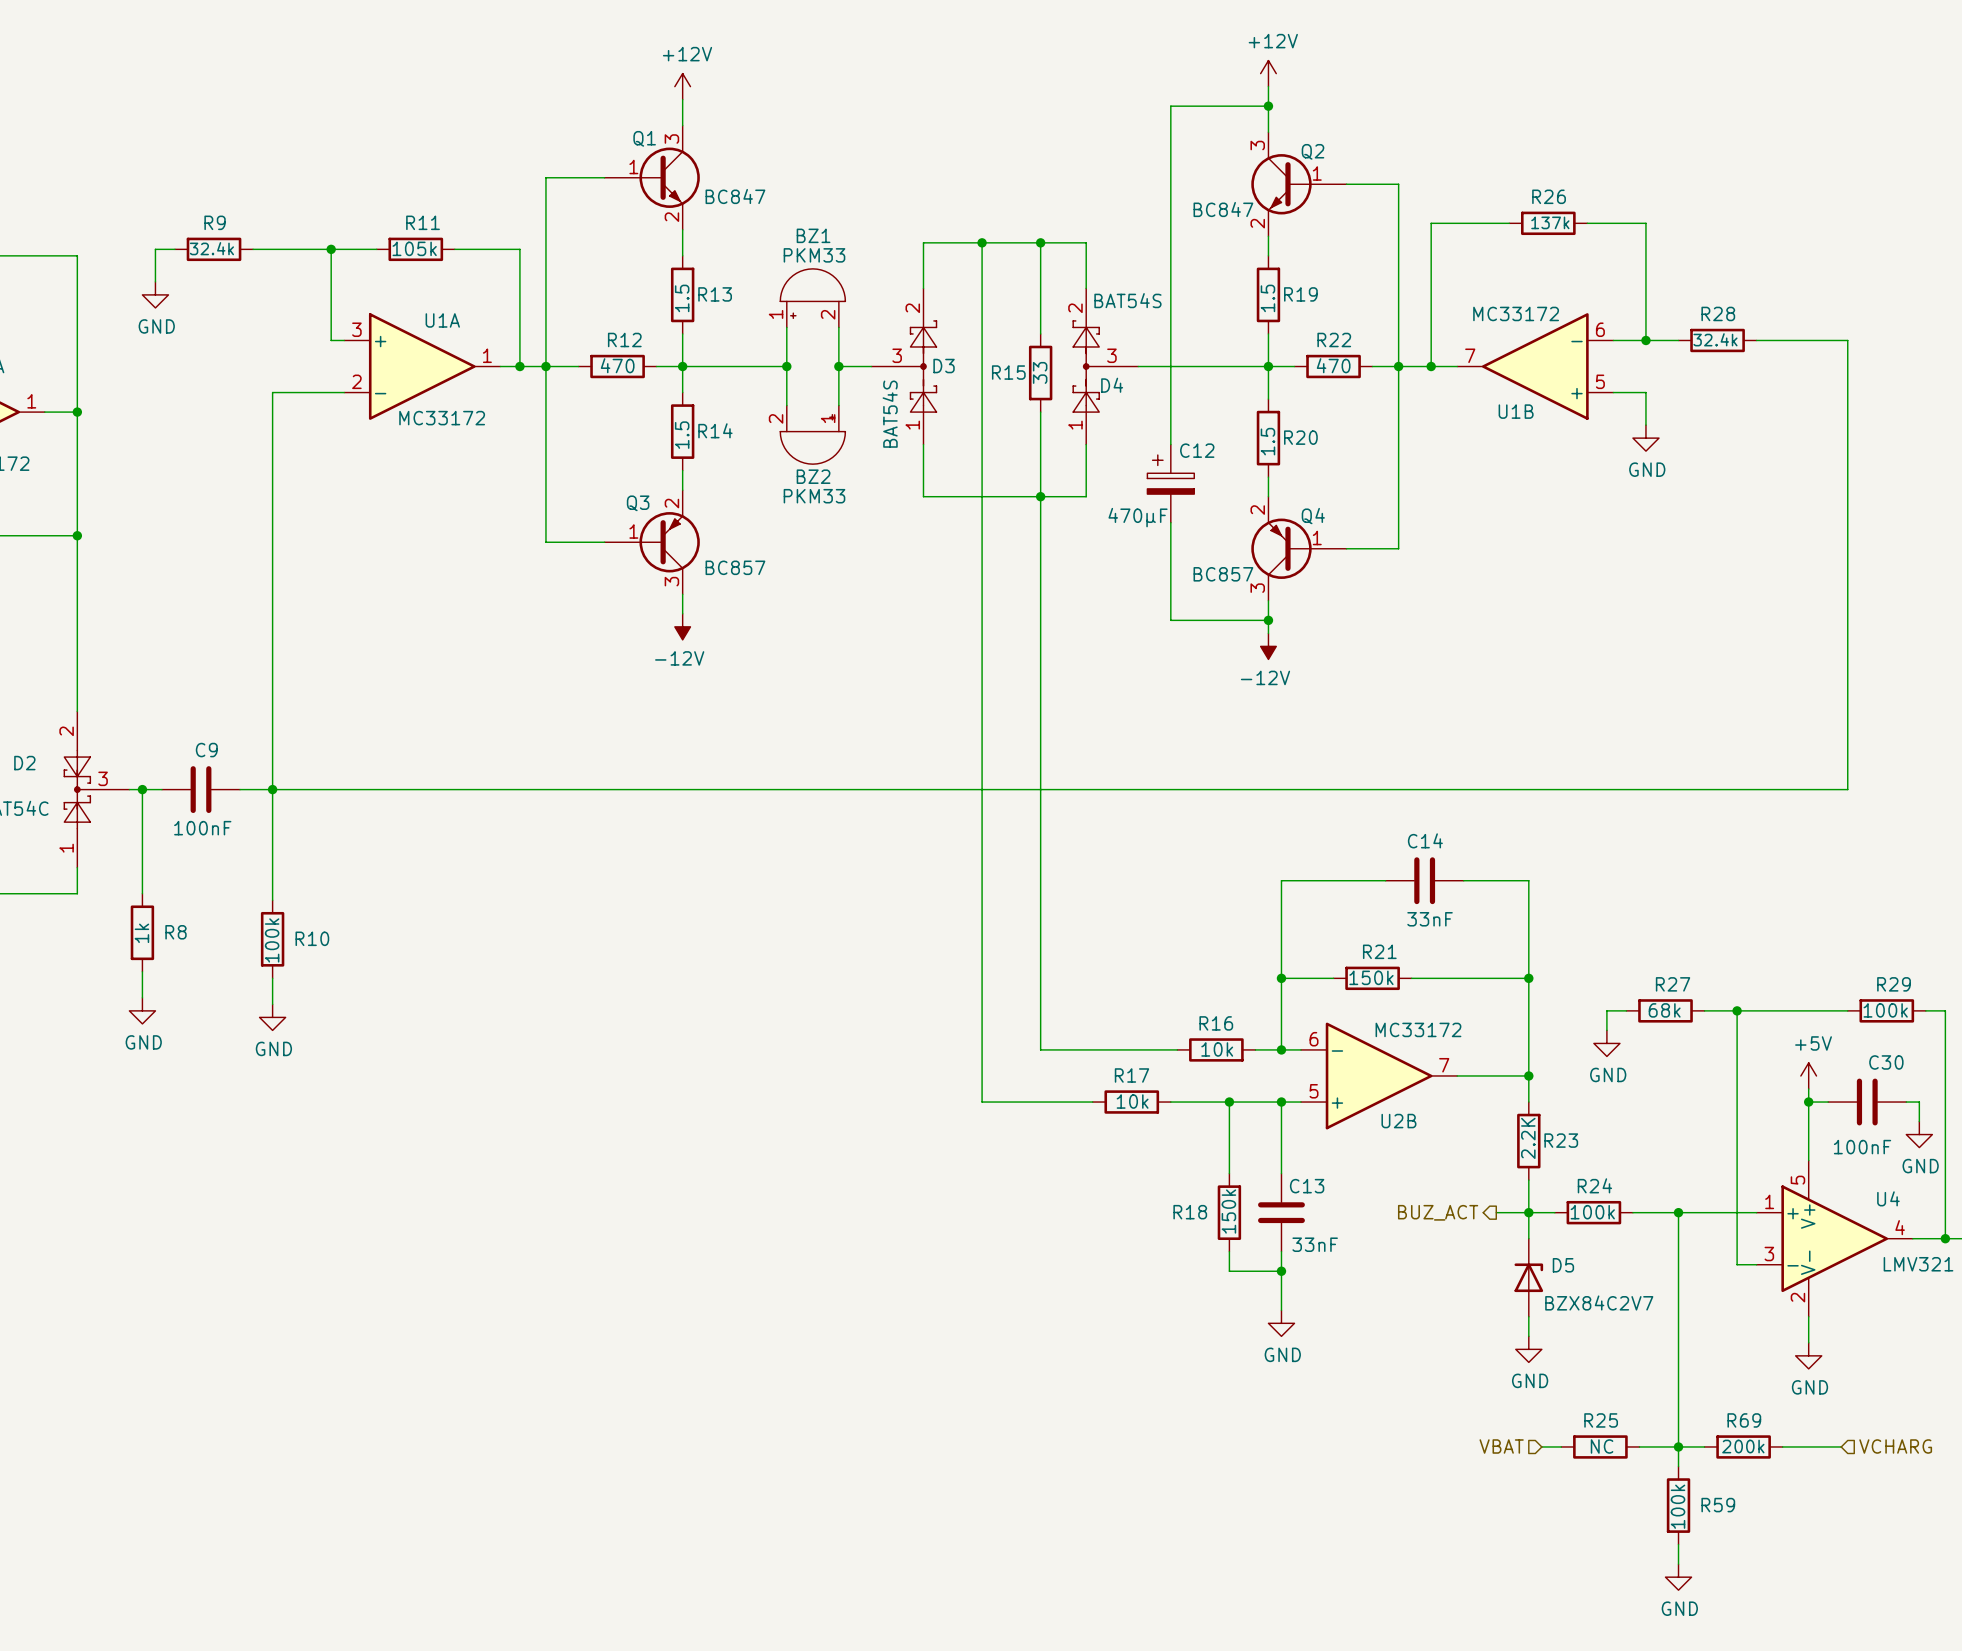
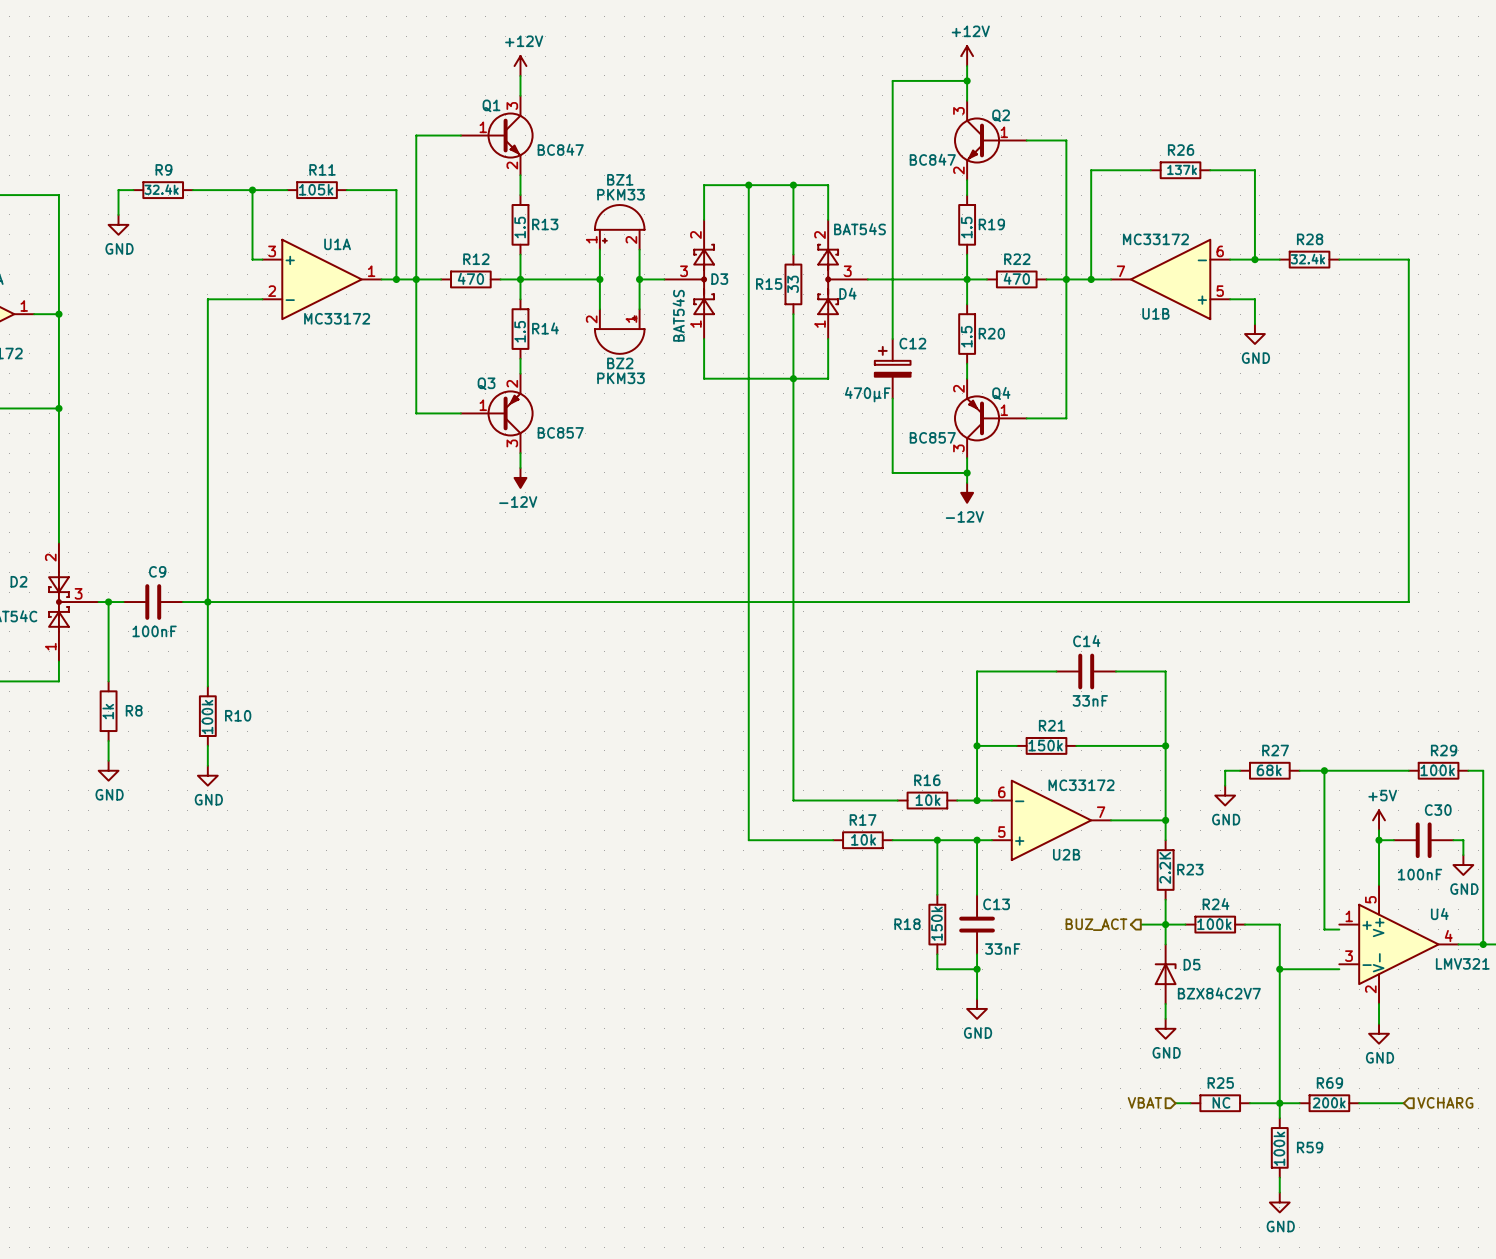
wire: (1678, 1212) (1756, 1212) -> (1279, 969) (1339, 969)
junction position: (1678, 1212) -> (1279, 969)
wire: (1737, 1219) (1737, 1264) (1756, 1264) -> (1324, 929) (1339, 929)

